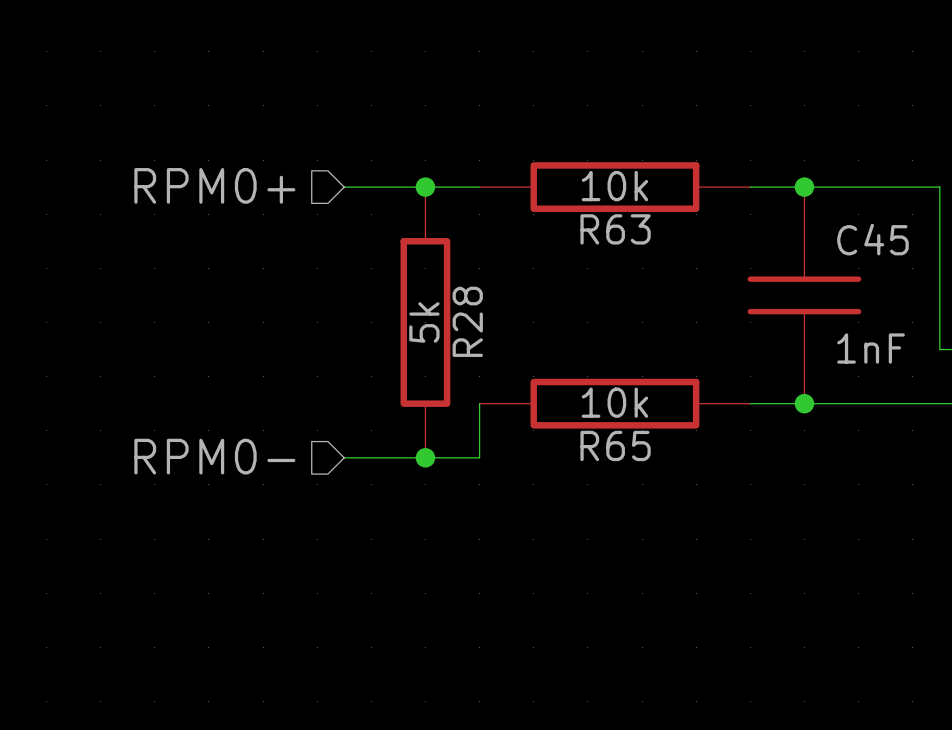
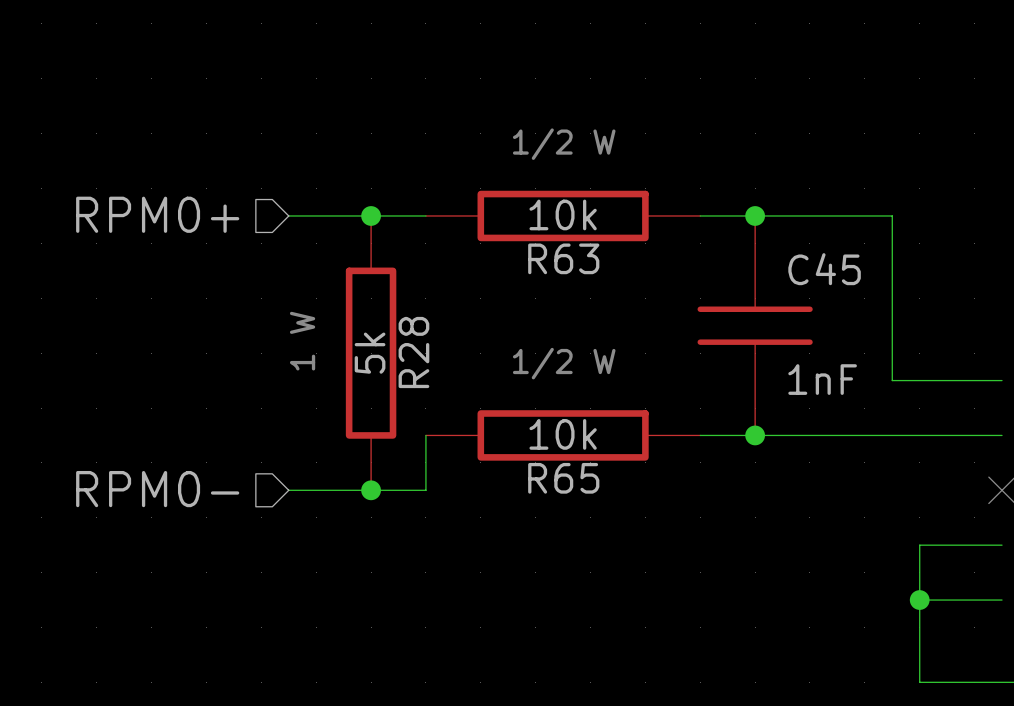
text: none -> 1/2 W (564, 144)
text: none -> 1 W (302, 341)
text: none -> 1/2 W (564, 363)

